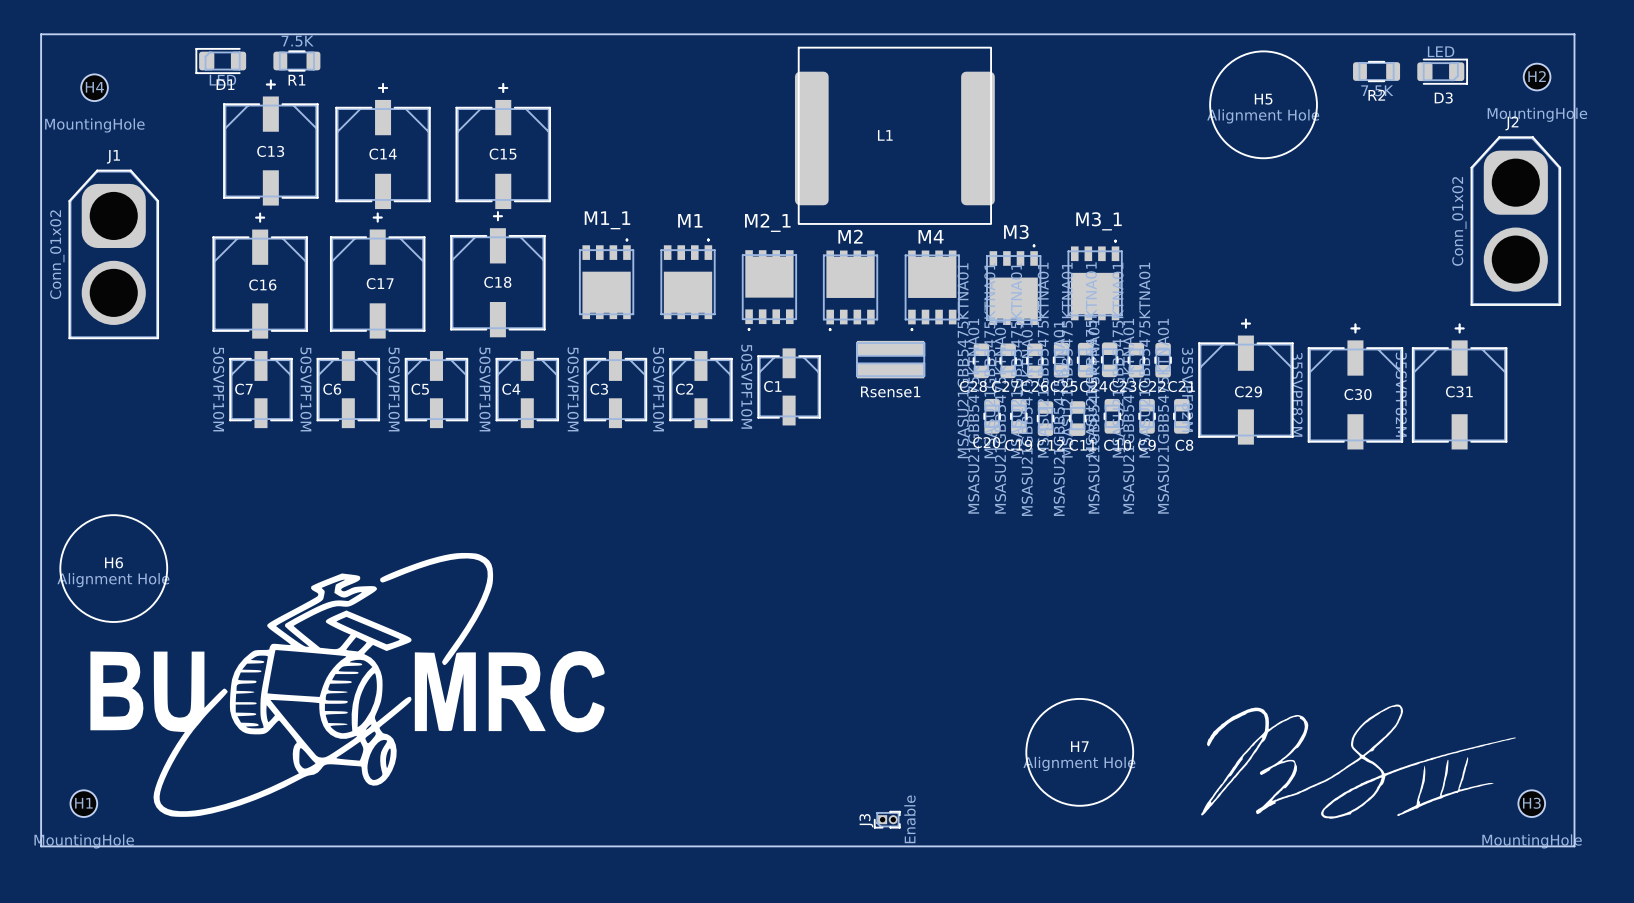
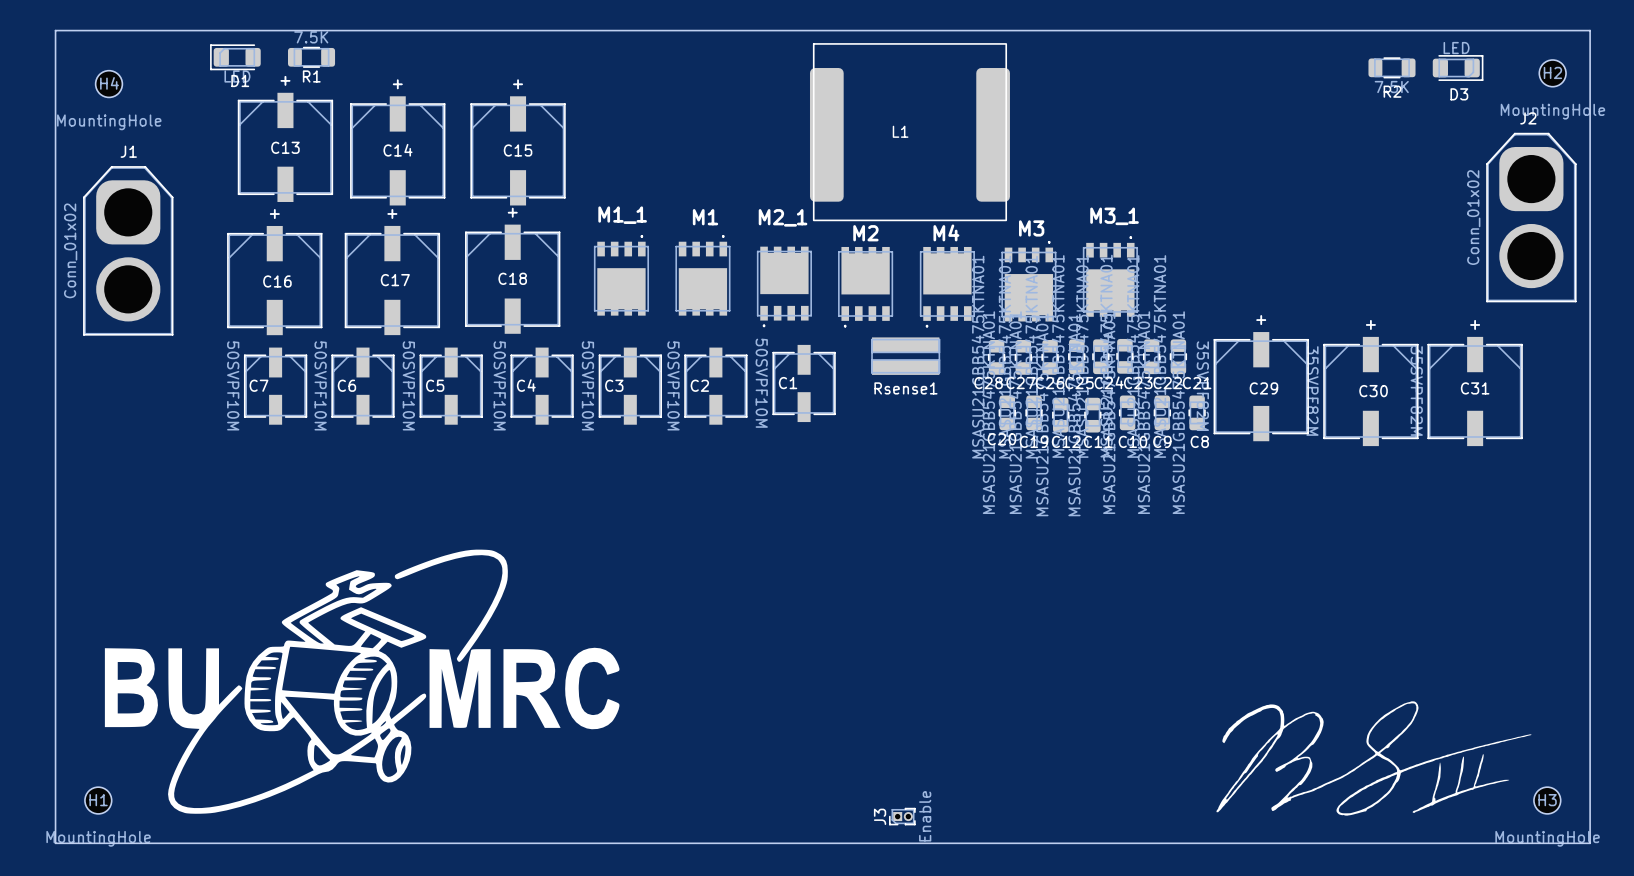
H5: Alignment Hole (1263, 104) -> none
H6: Alignment Hole (113, 568) -> none
H7: Alignment Hole (1079, 752) -> none

